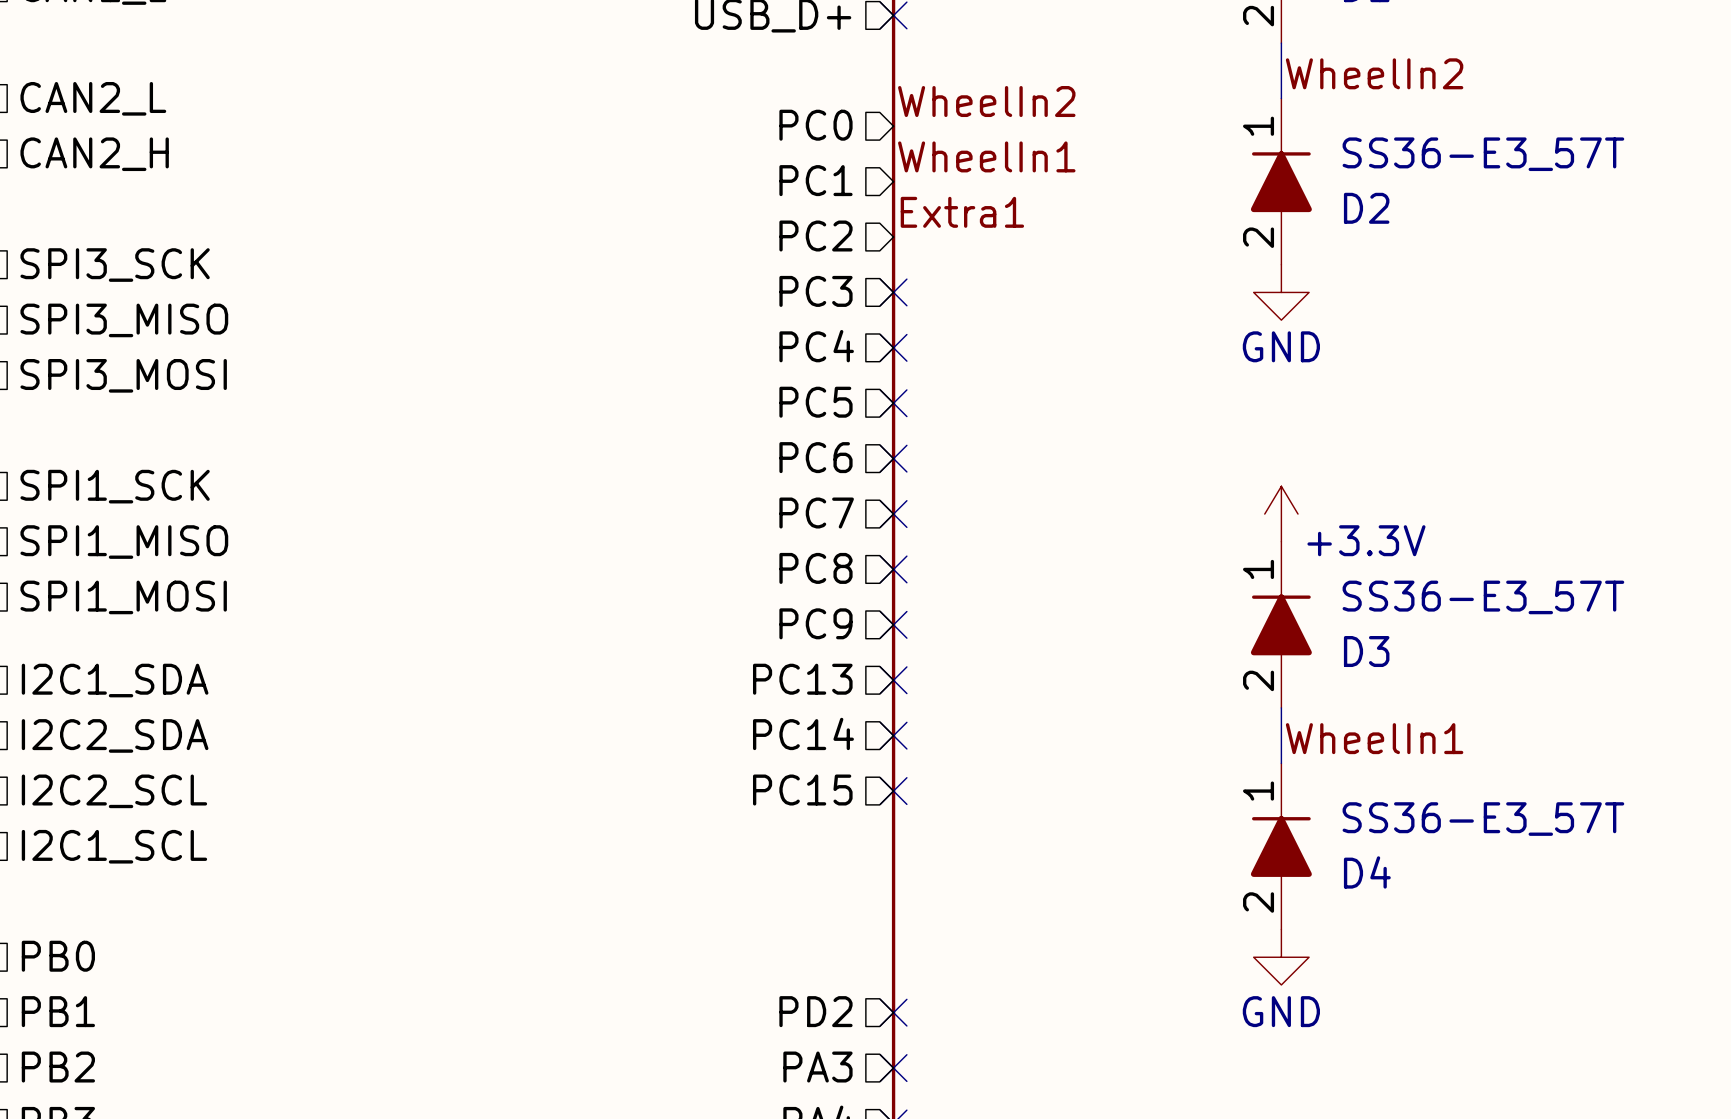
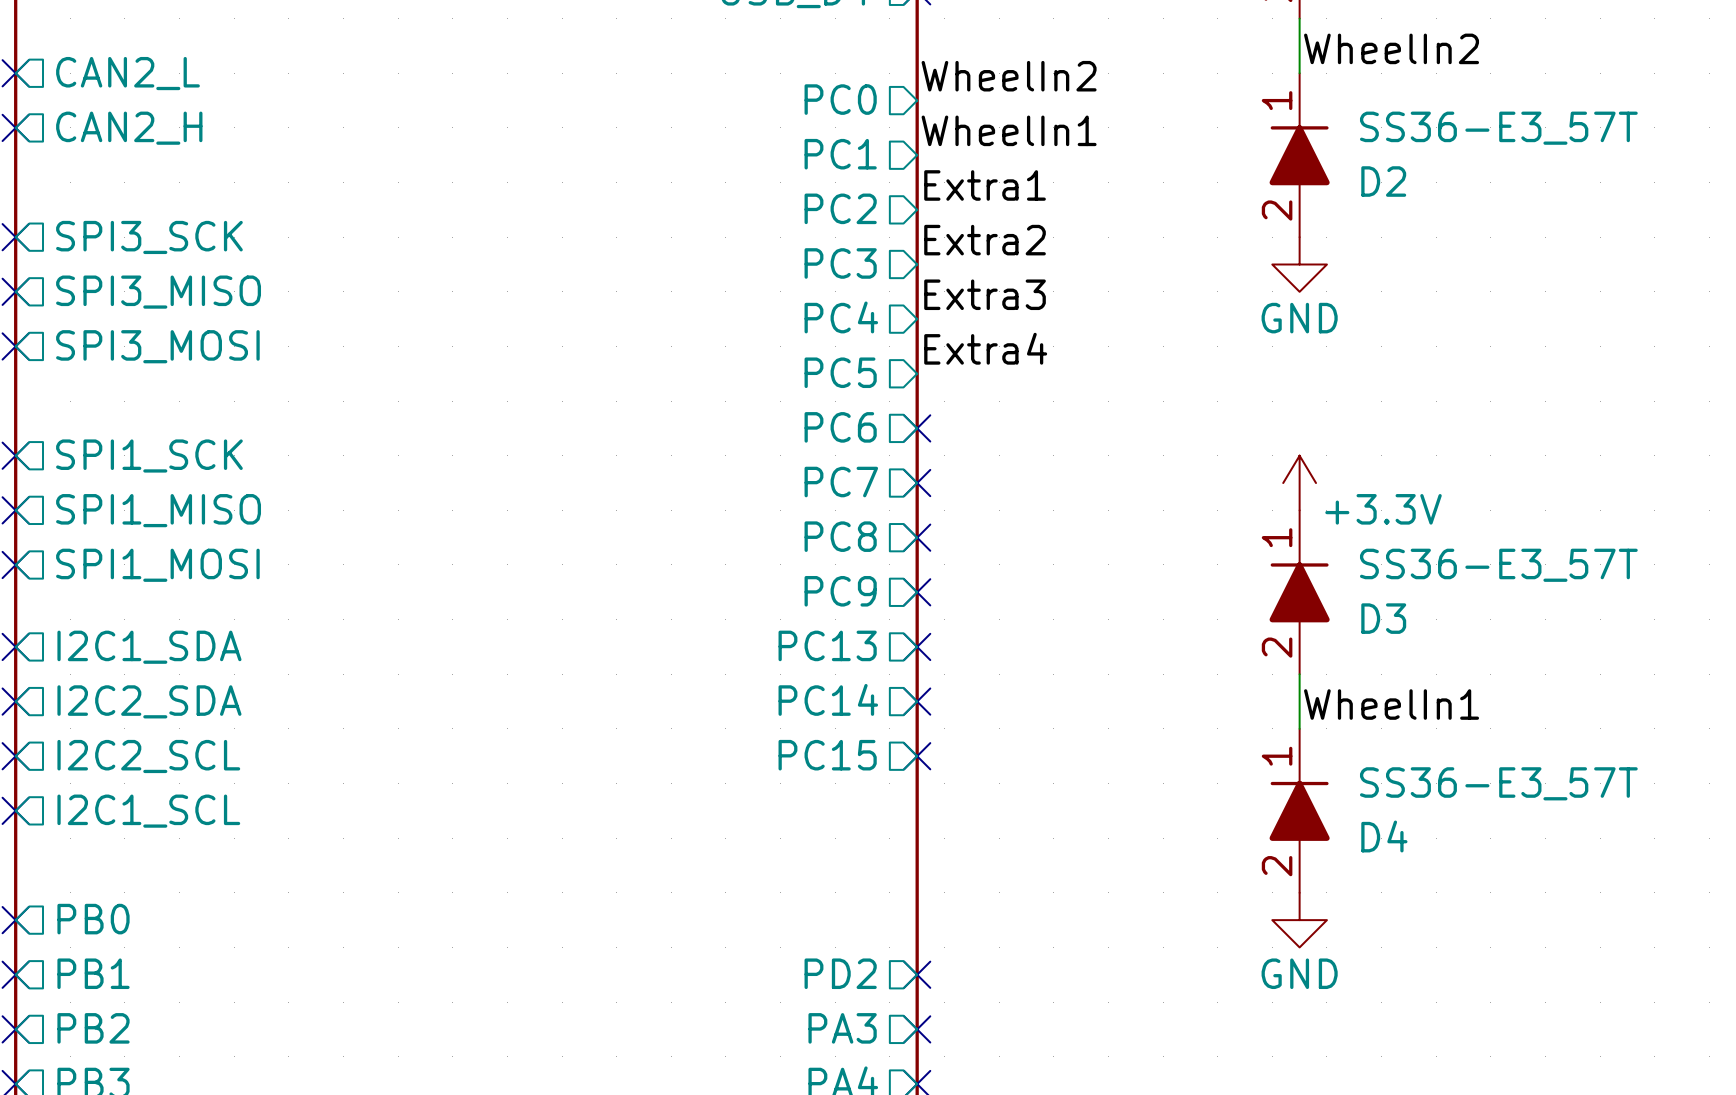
label: none -> Extra2 (985, 240)
no-connect mark: (893, 292) -> none
label: none -> Extra3 (985, 294)
no-connect mark: (893, 347) -> none
label: none -> Extra4 (985, 348)
no-connect mark: (893, 403) -> none

